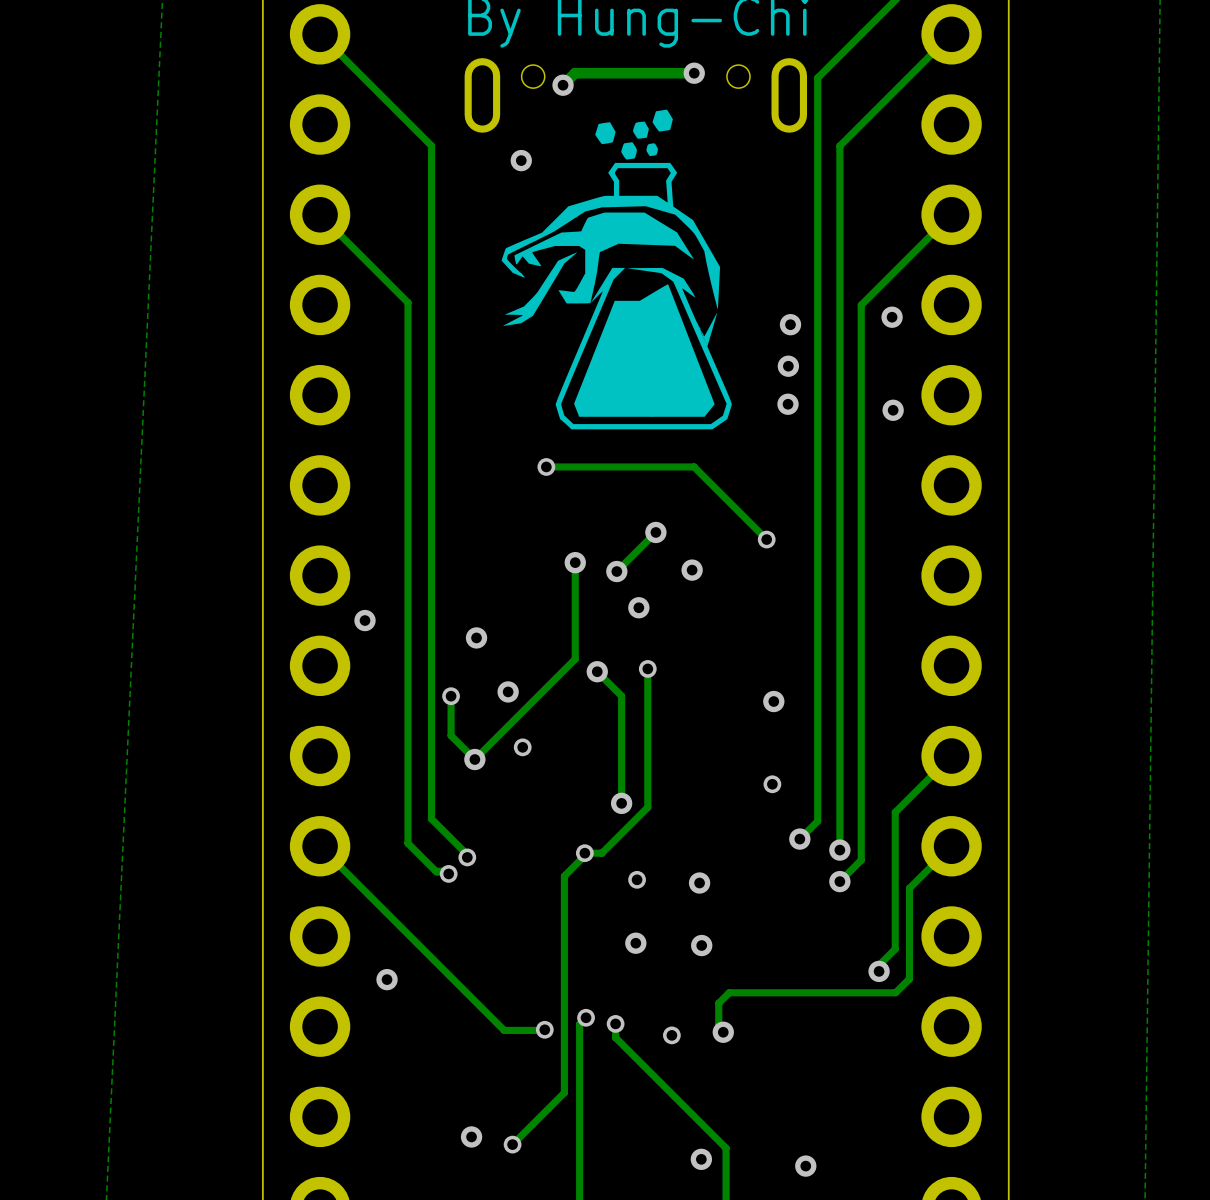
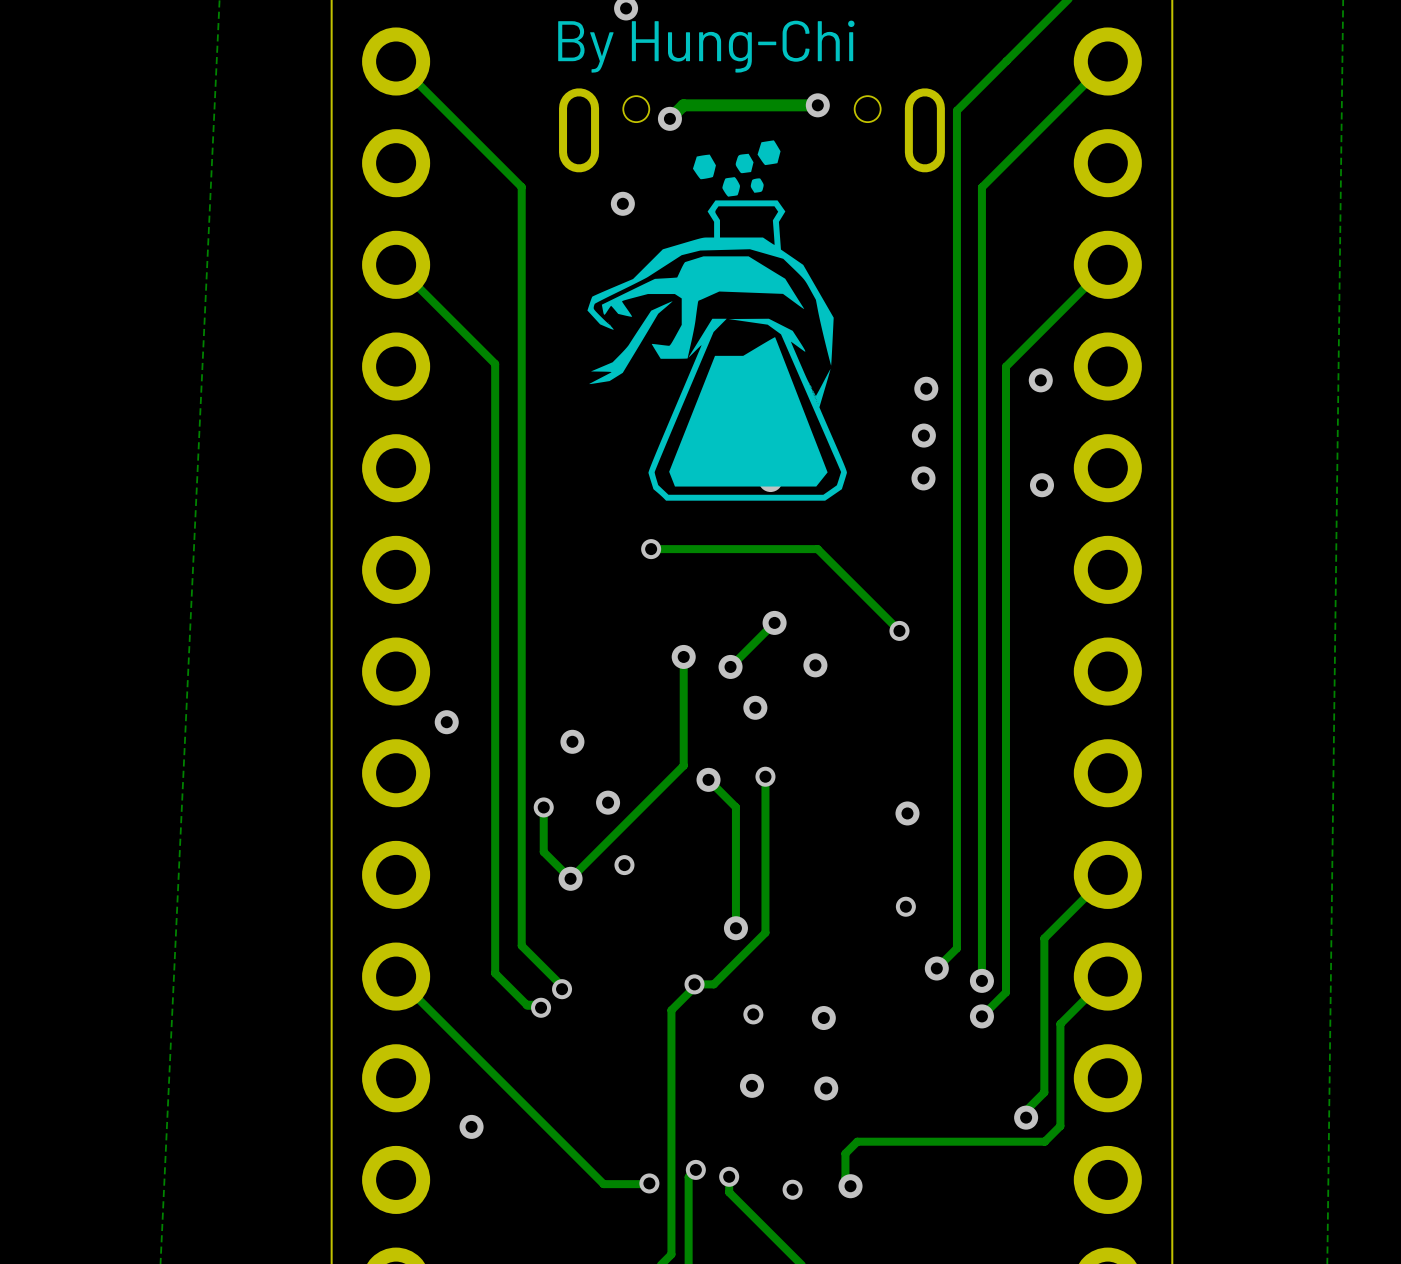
drawing position: (616, 269) -> (717, 320)

